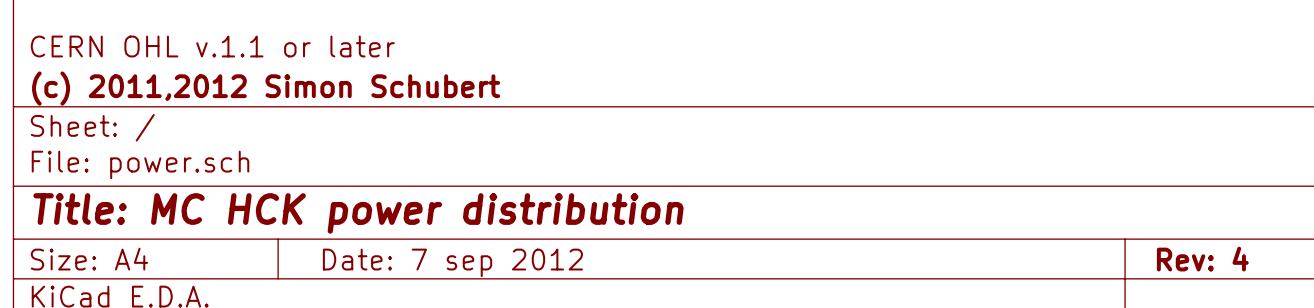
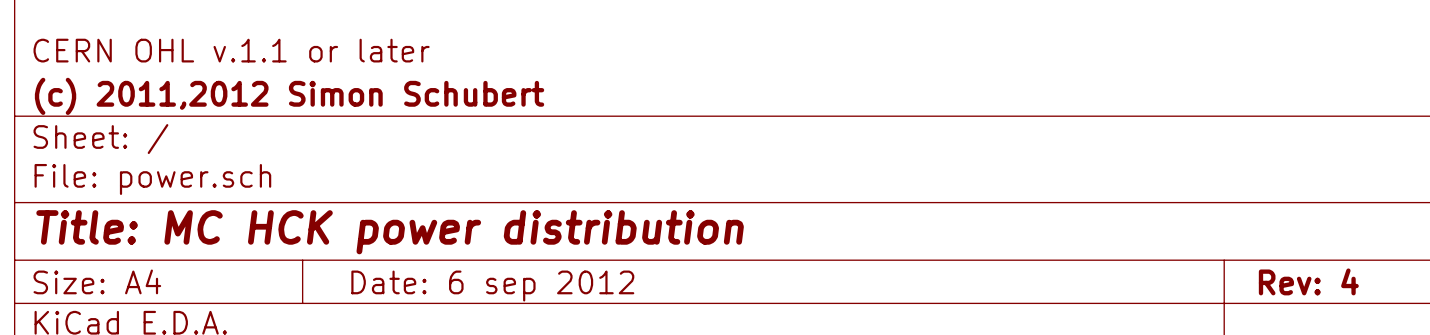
title block: Date: 7 sep 2012 (452, 262) -> Date: 6 sep 2012 (492, 286)

